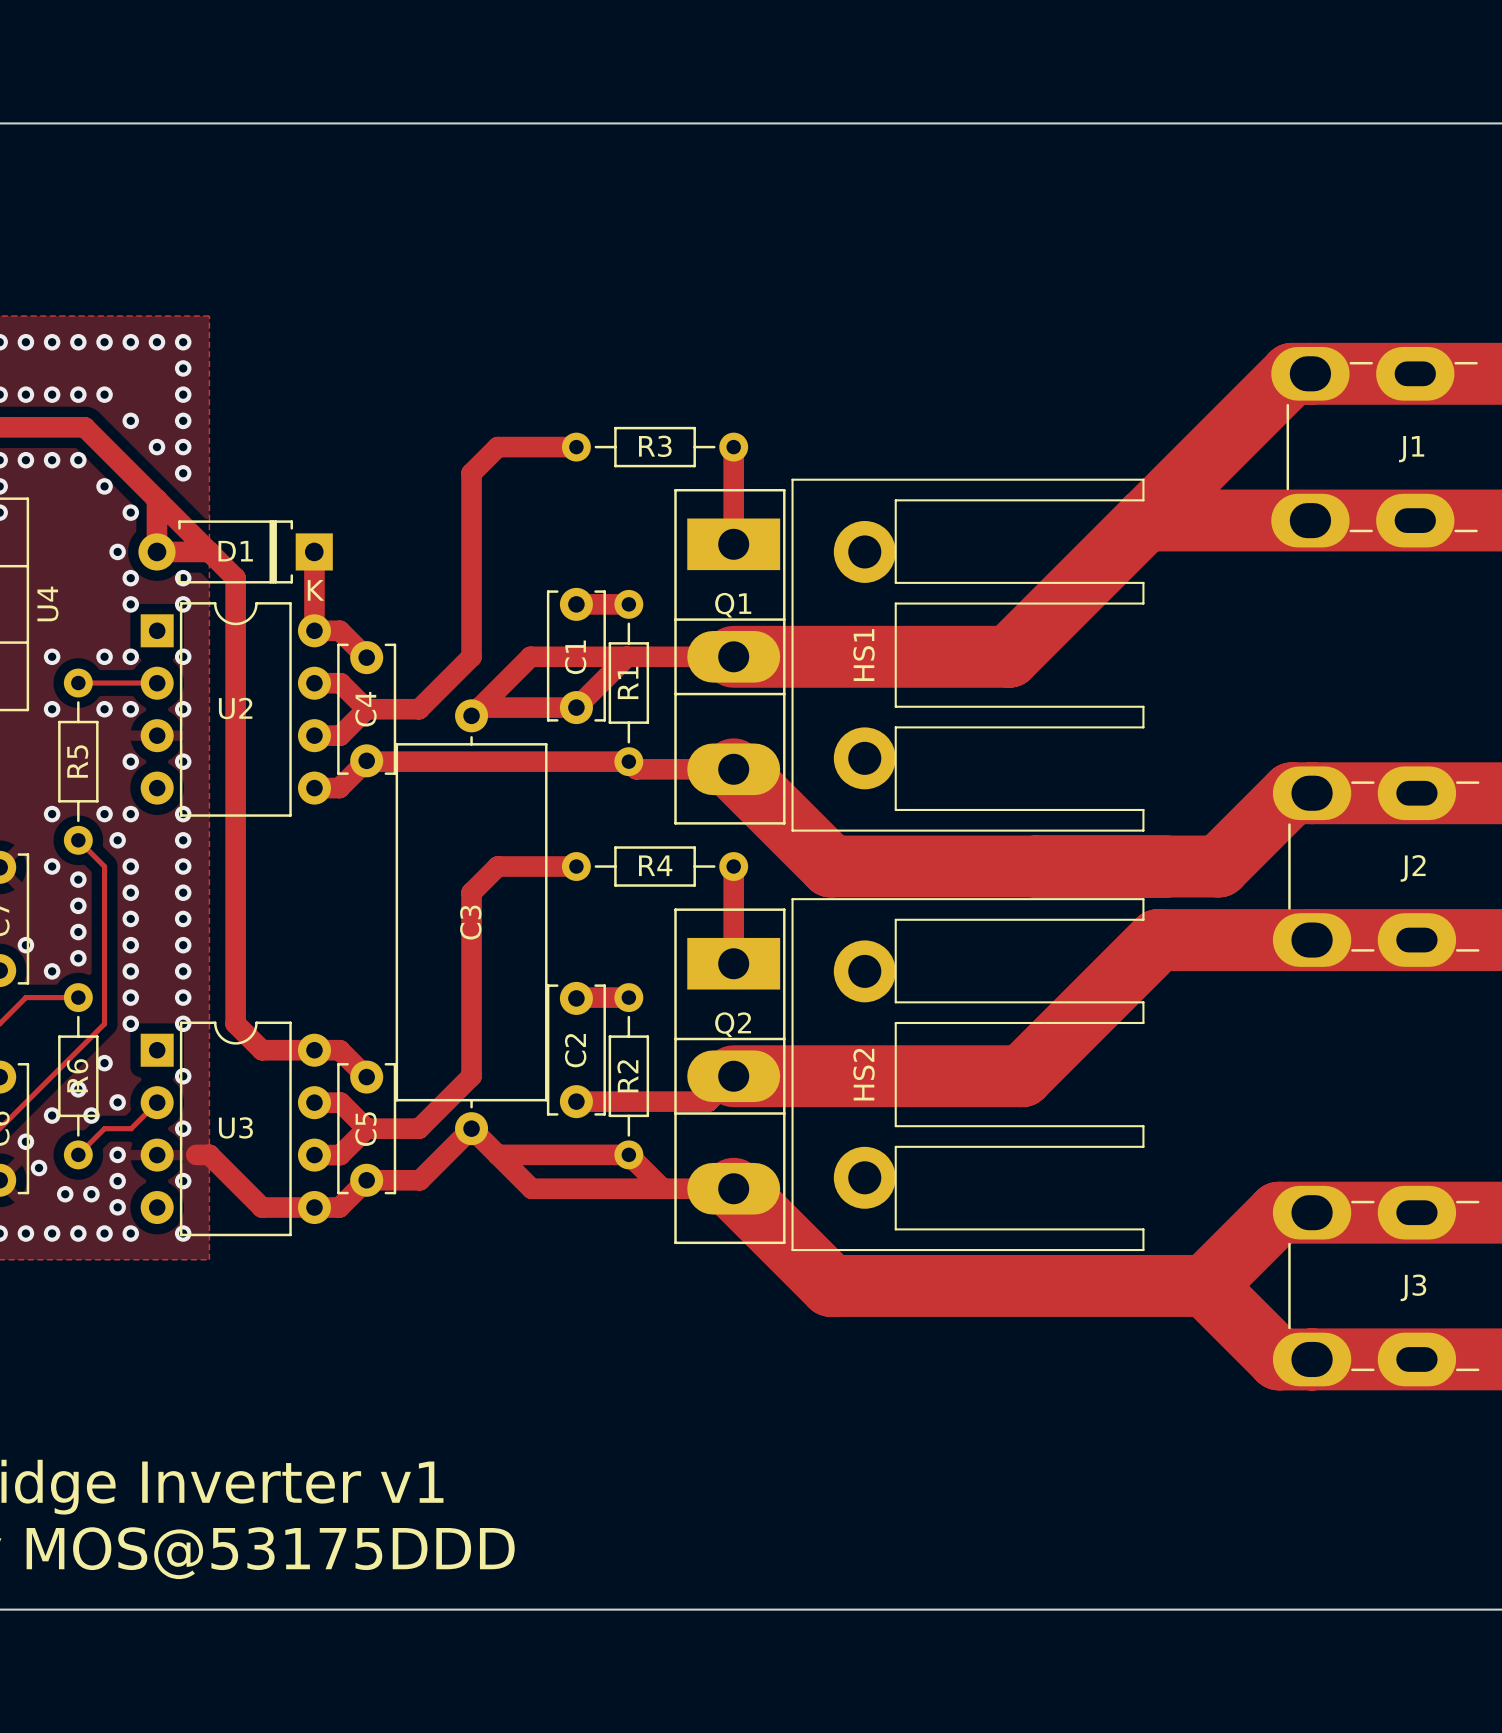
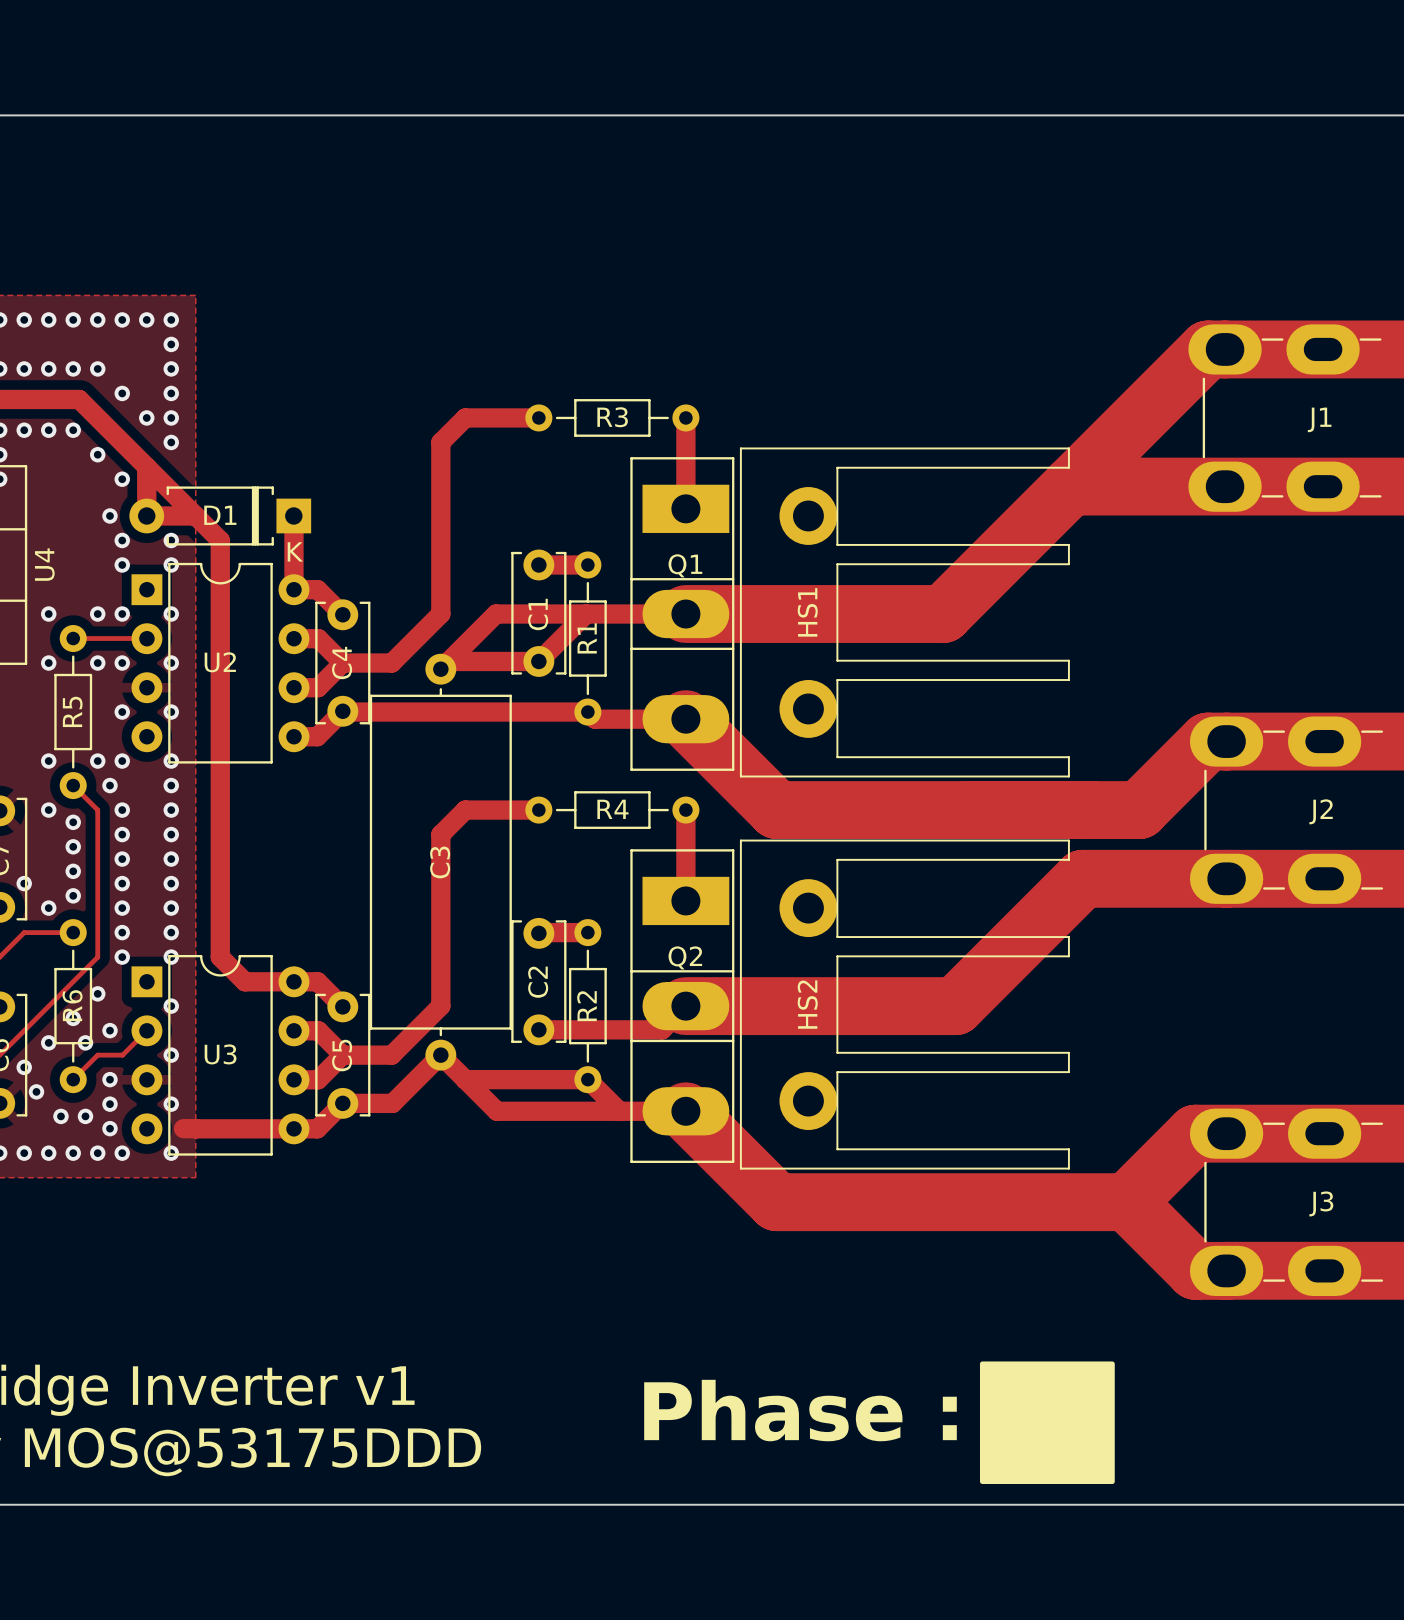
track: (196, 1154) (209, 1154) (262, 1207) -> (195, 1128) (244, 1128)
track: none -> (183, 1128) (195, 1128)
drawing: none -> [979, 1361, 1115, 1485]
text: none -> Phase : (800, 1410)

